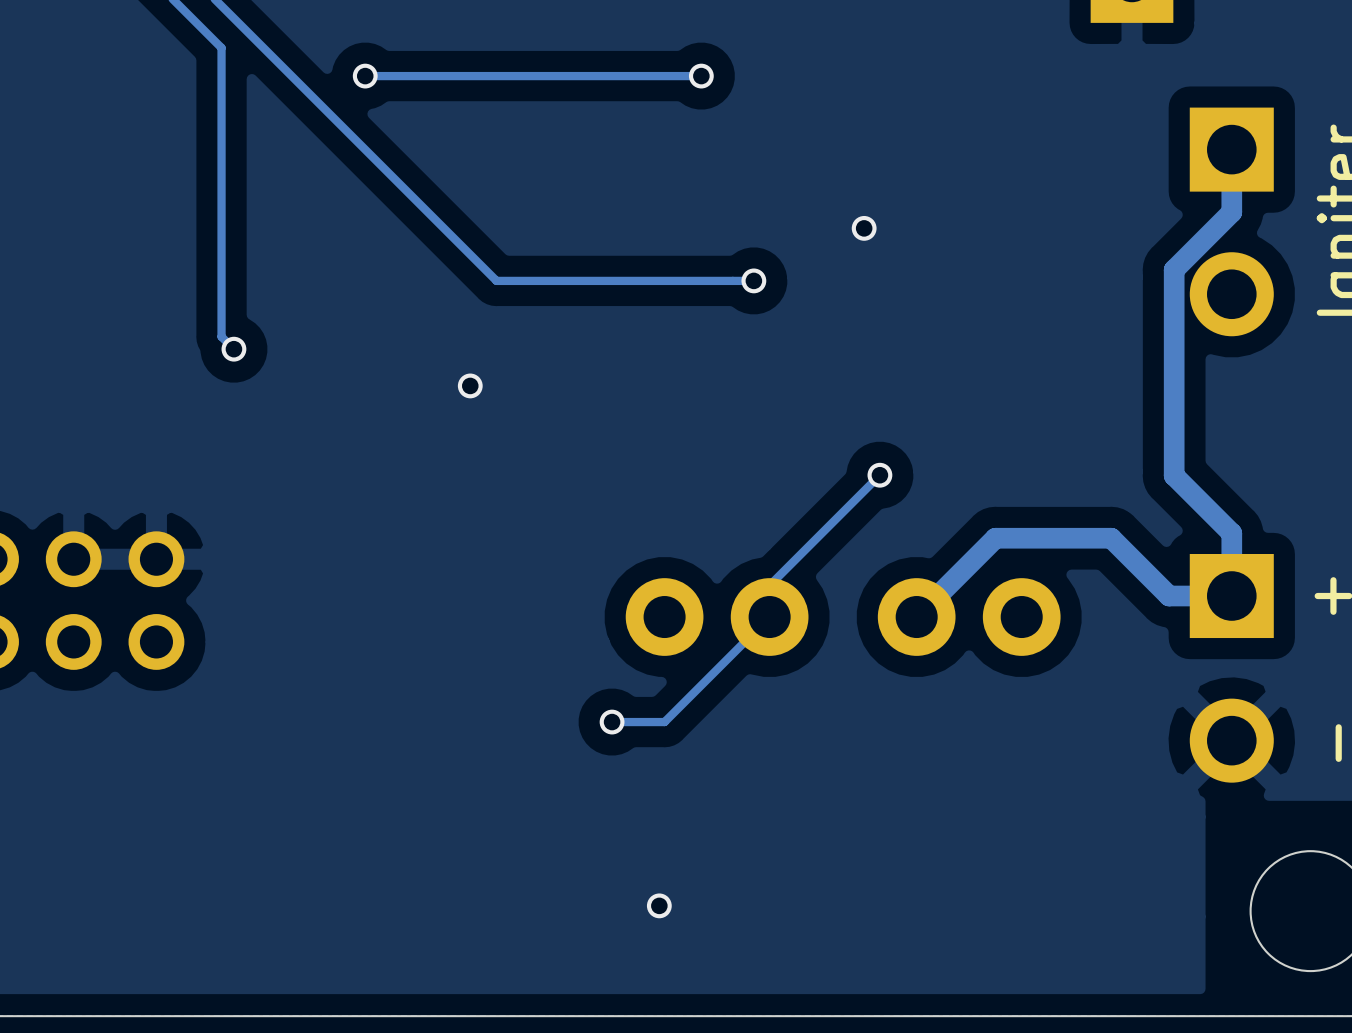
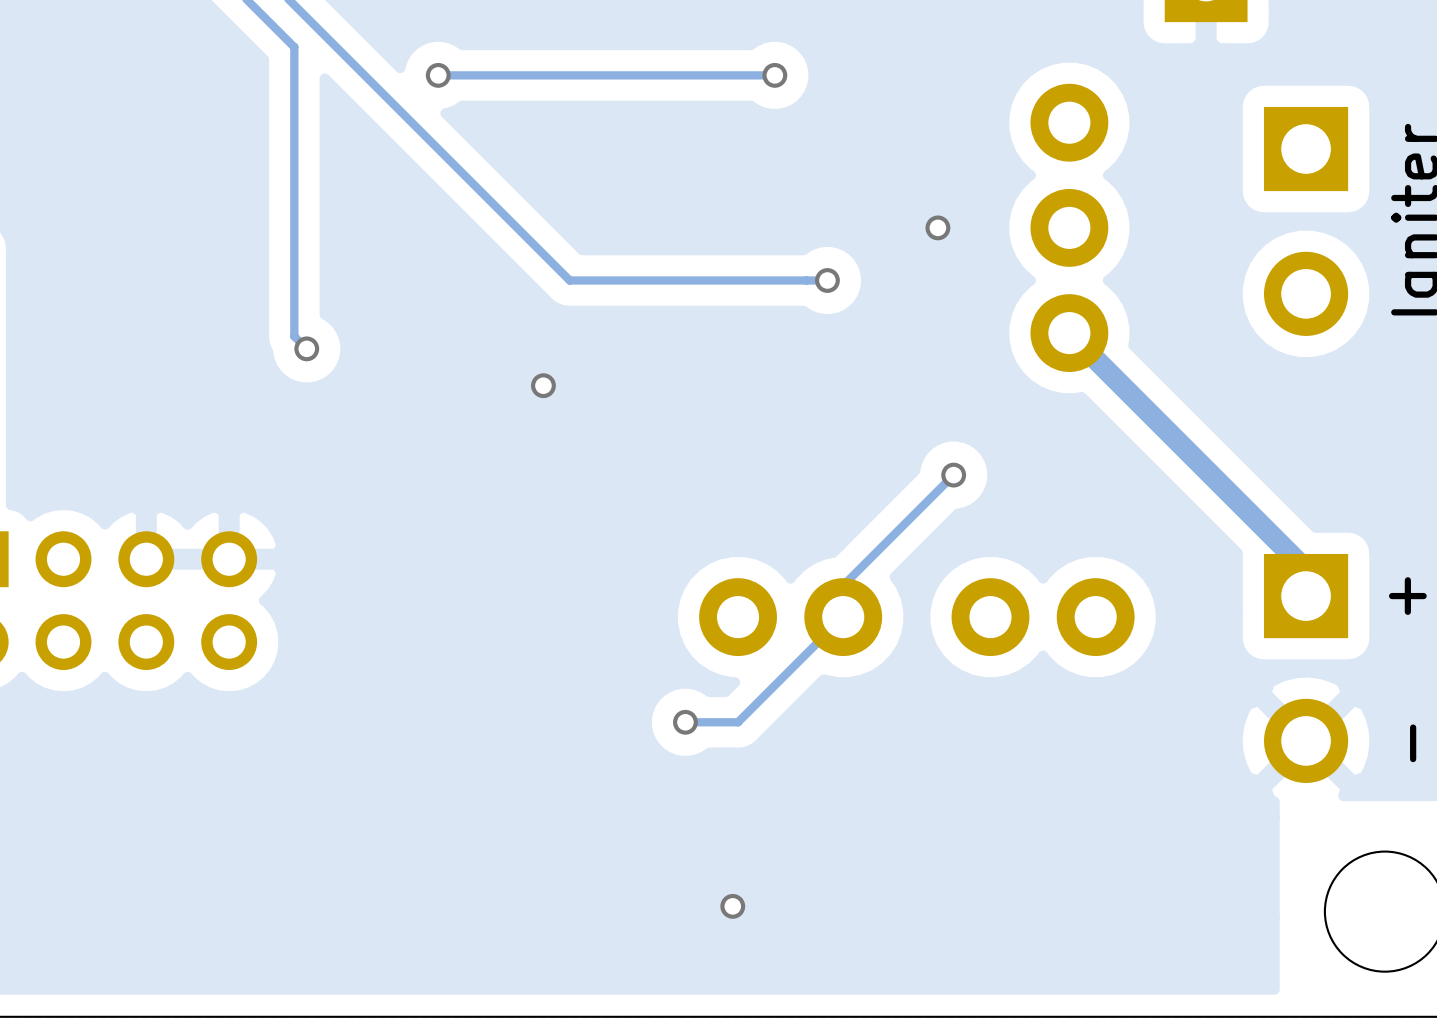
track: (1231, 149) (1231, 212) (1174, 269) (1174, 475) (1231, 533) (1231, 569) -> (1069, 333) (1306, 569)
part: none -> (1069, 227)
track: (1231, 596) (1169, 596) (1111, 538) (995, 538) (916, 617) -> none

